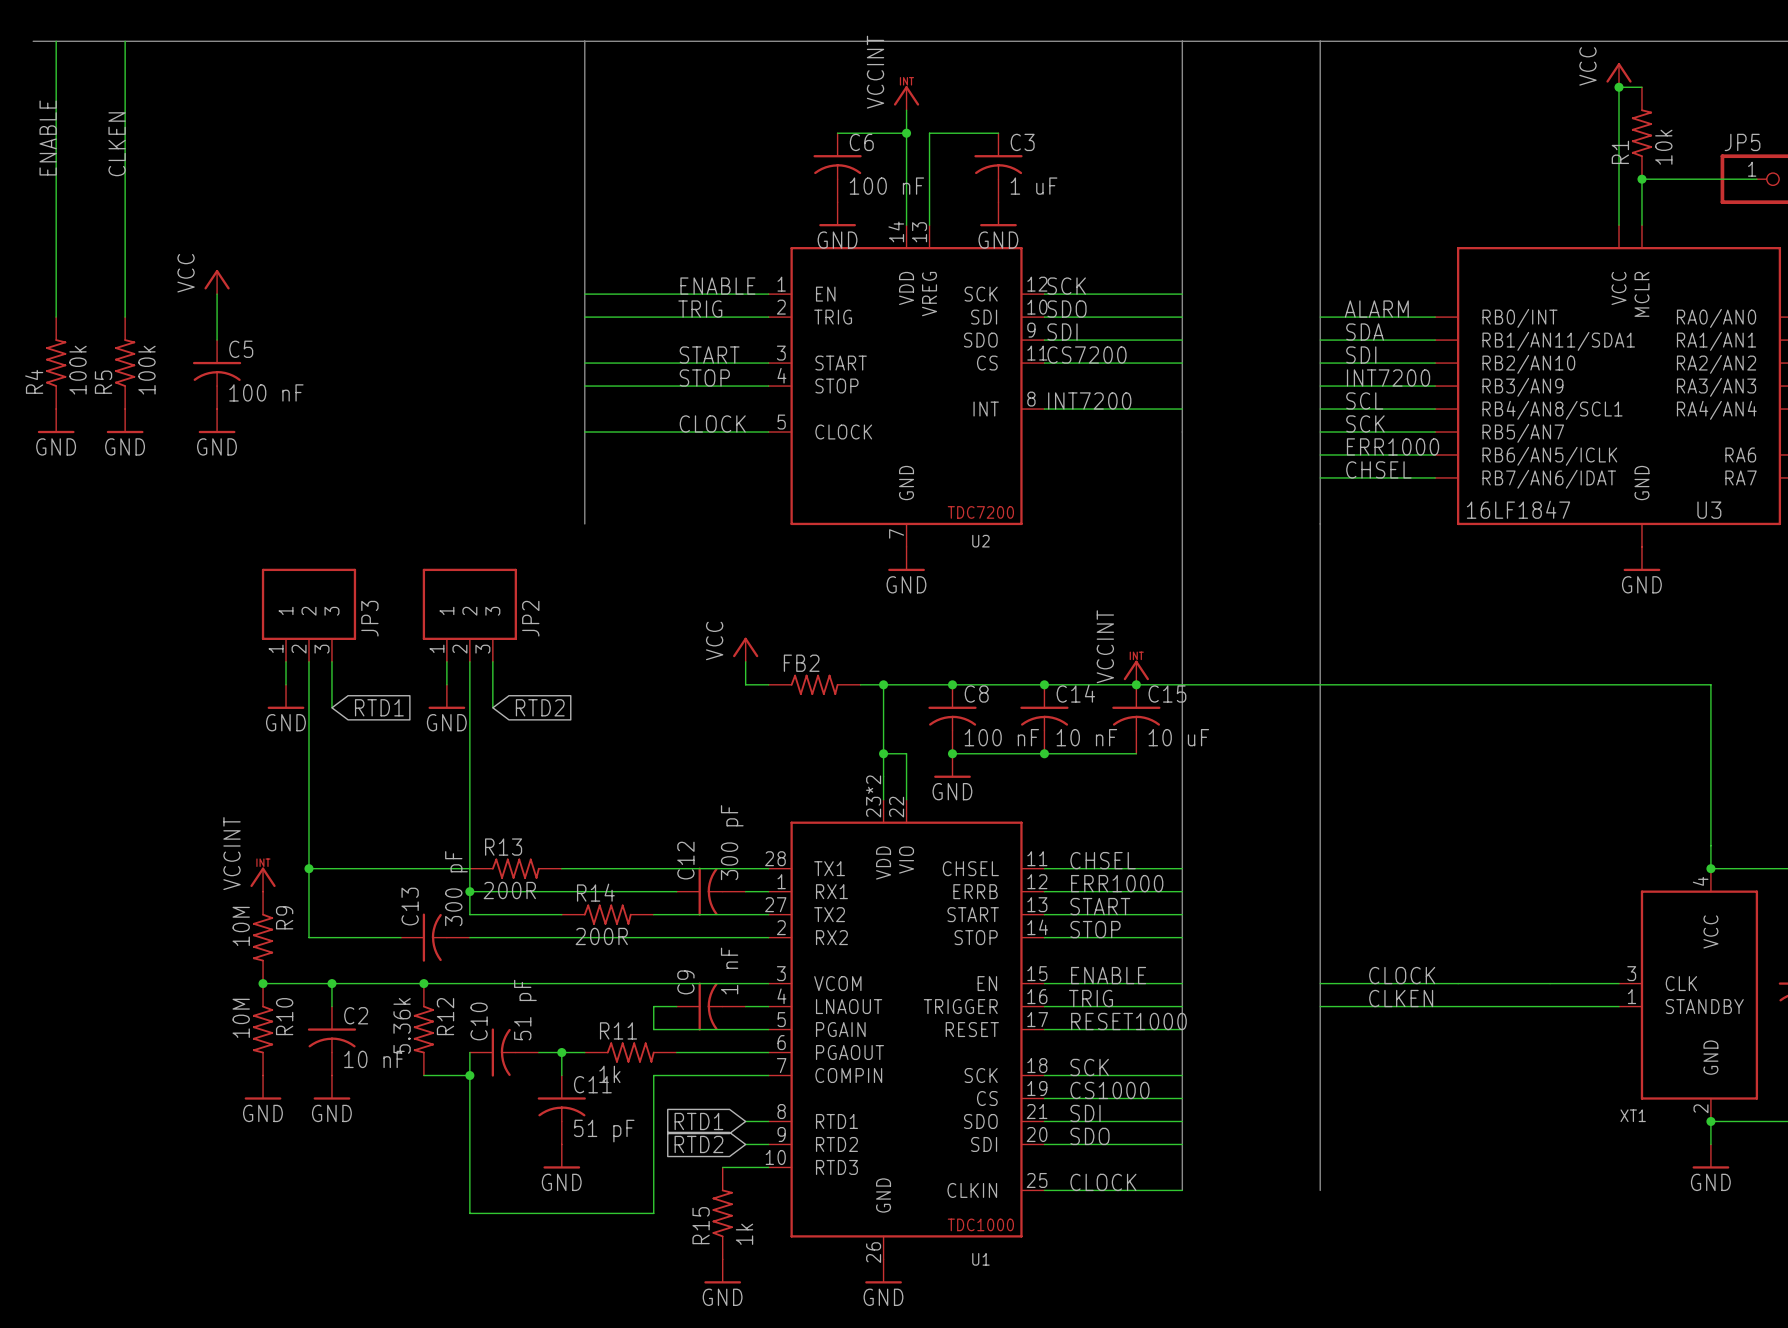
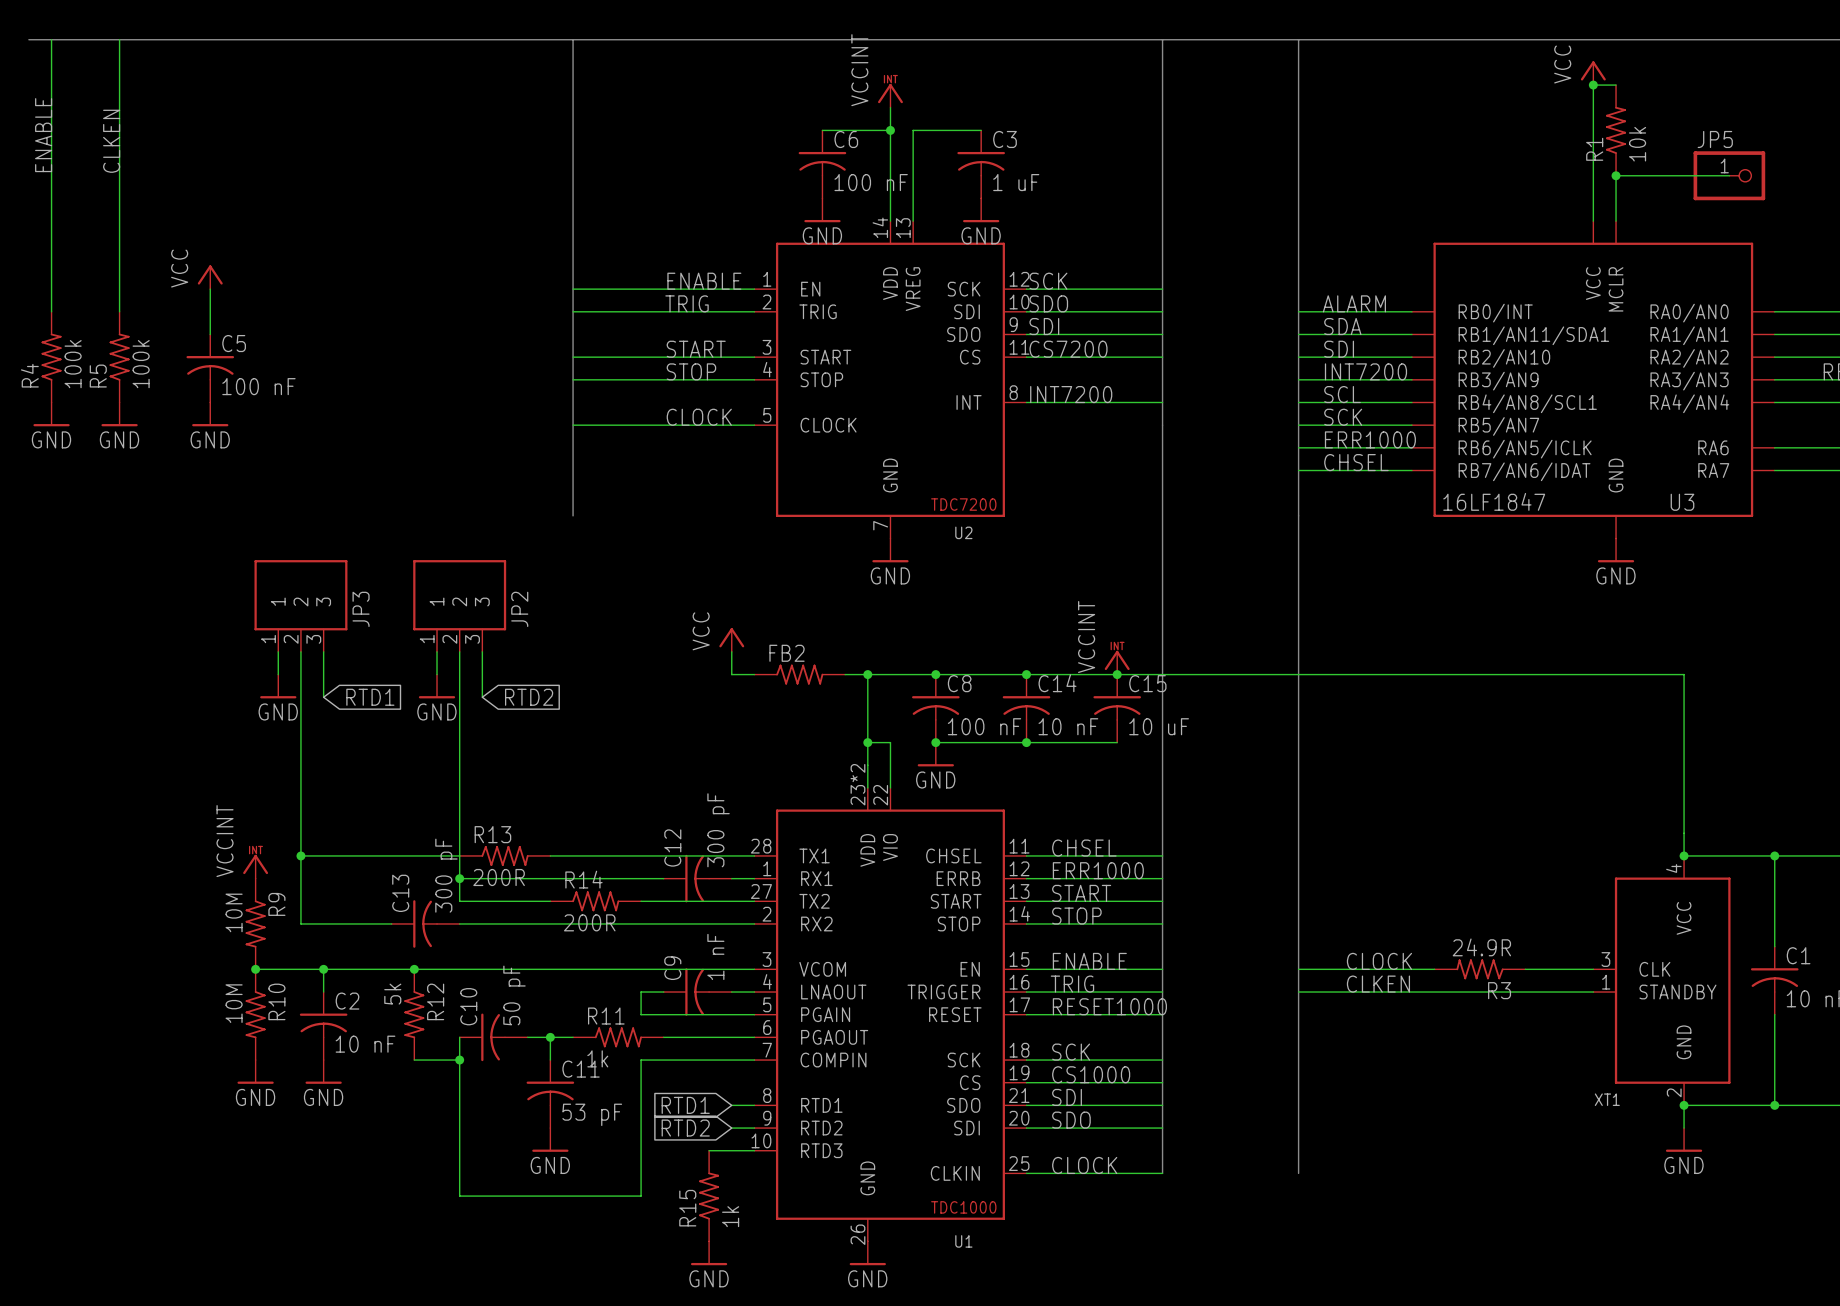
R3: none -> 24.9R (1479, 969)
C10 value: 51 pF (525, 1010) -> 50 pF (514, 995)
R12 value: 5.36k (402, 1025) -> 5k (392, 994)
C11 value: 51 pF (604, 1131) -> 53 pF (592, 1114)

